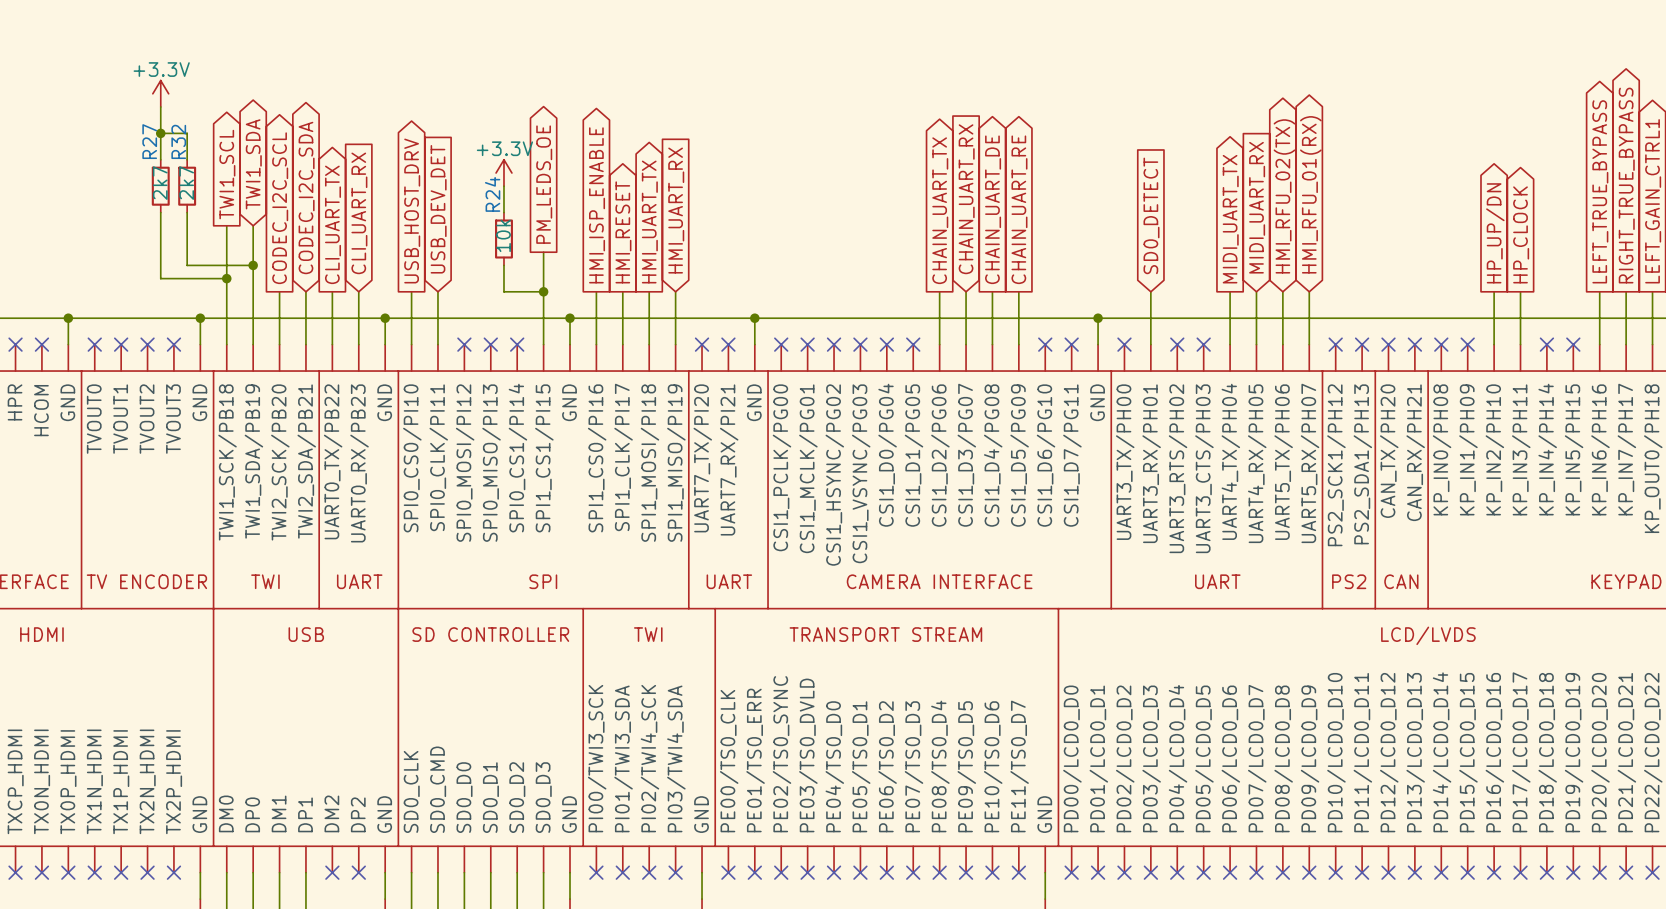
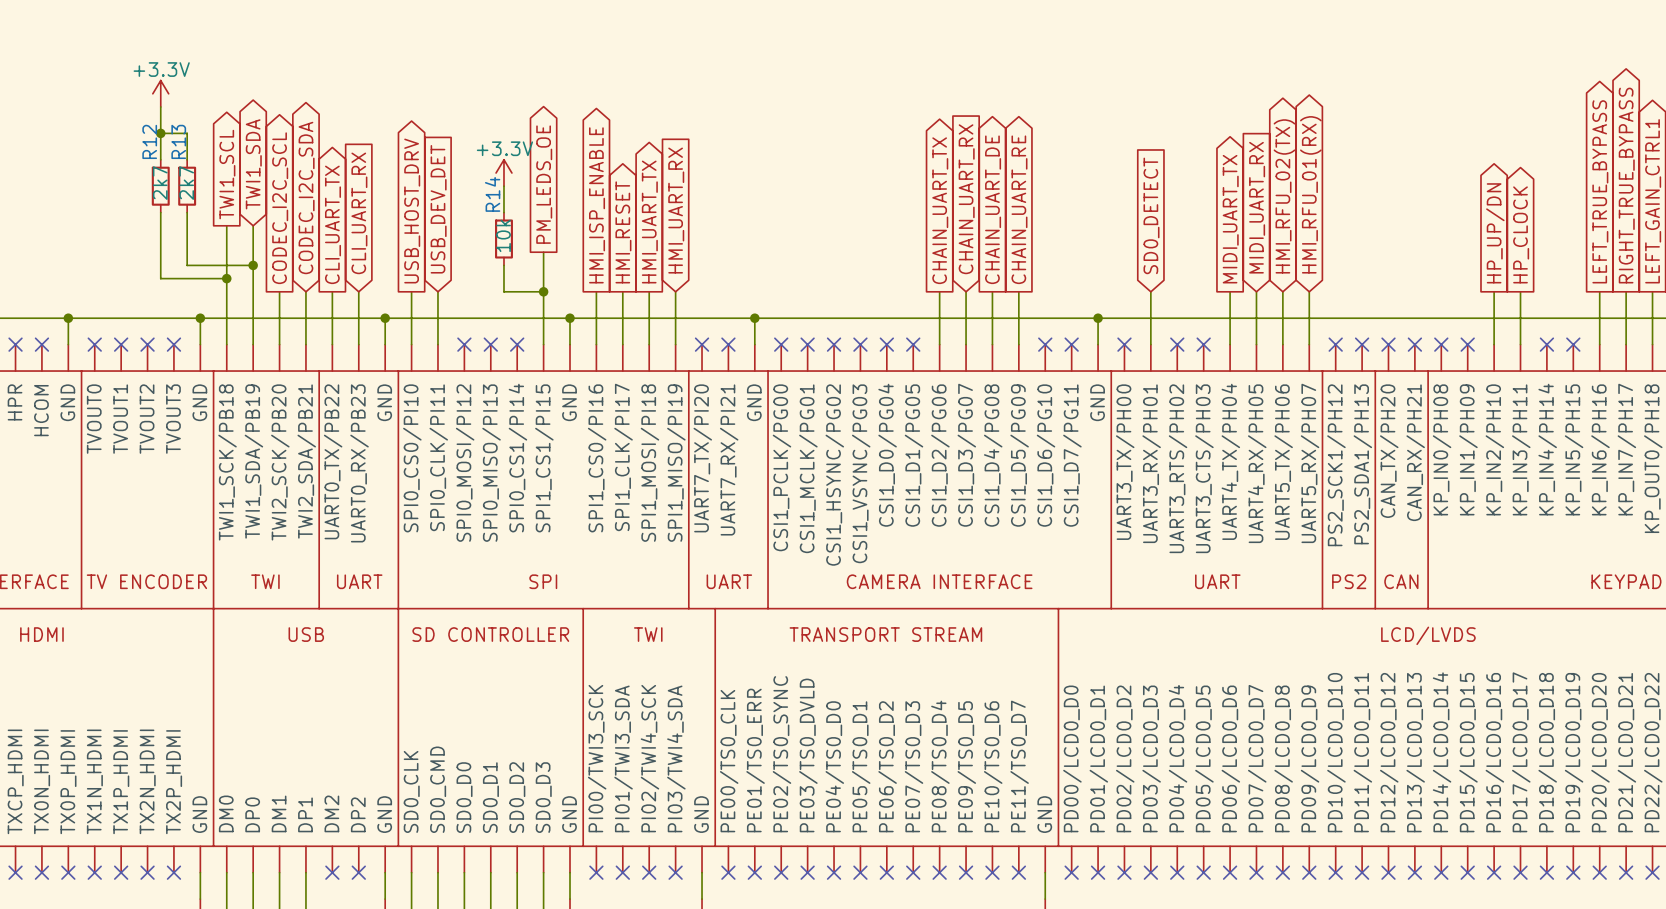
R27 name: R27 (149, 141) -> R12 (149, 141)
R32 name: R32 (178, 141) -> R13 (178, 141)
R24 name: R24 (492, 194) -> R14 (492, 194)

